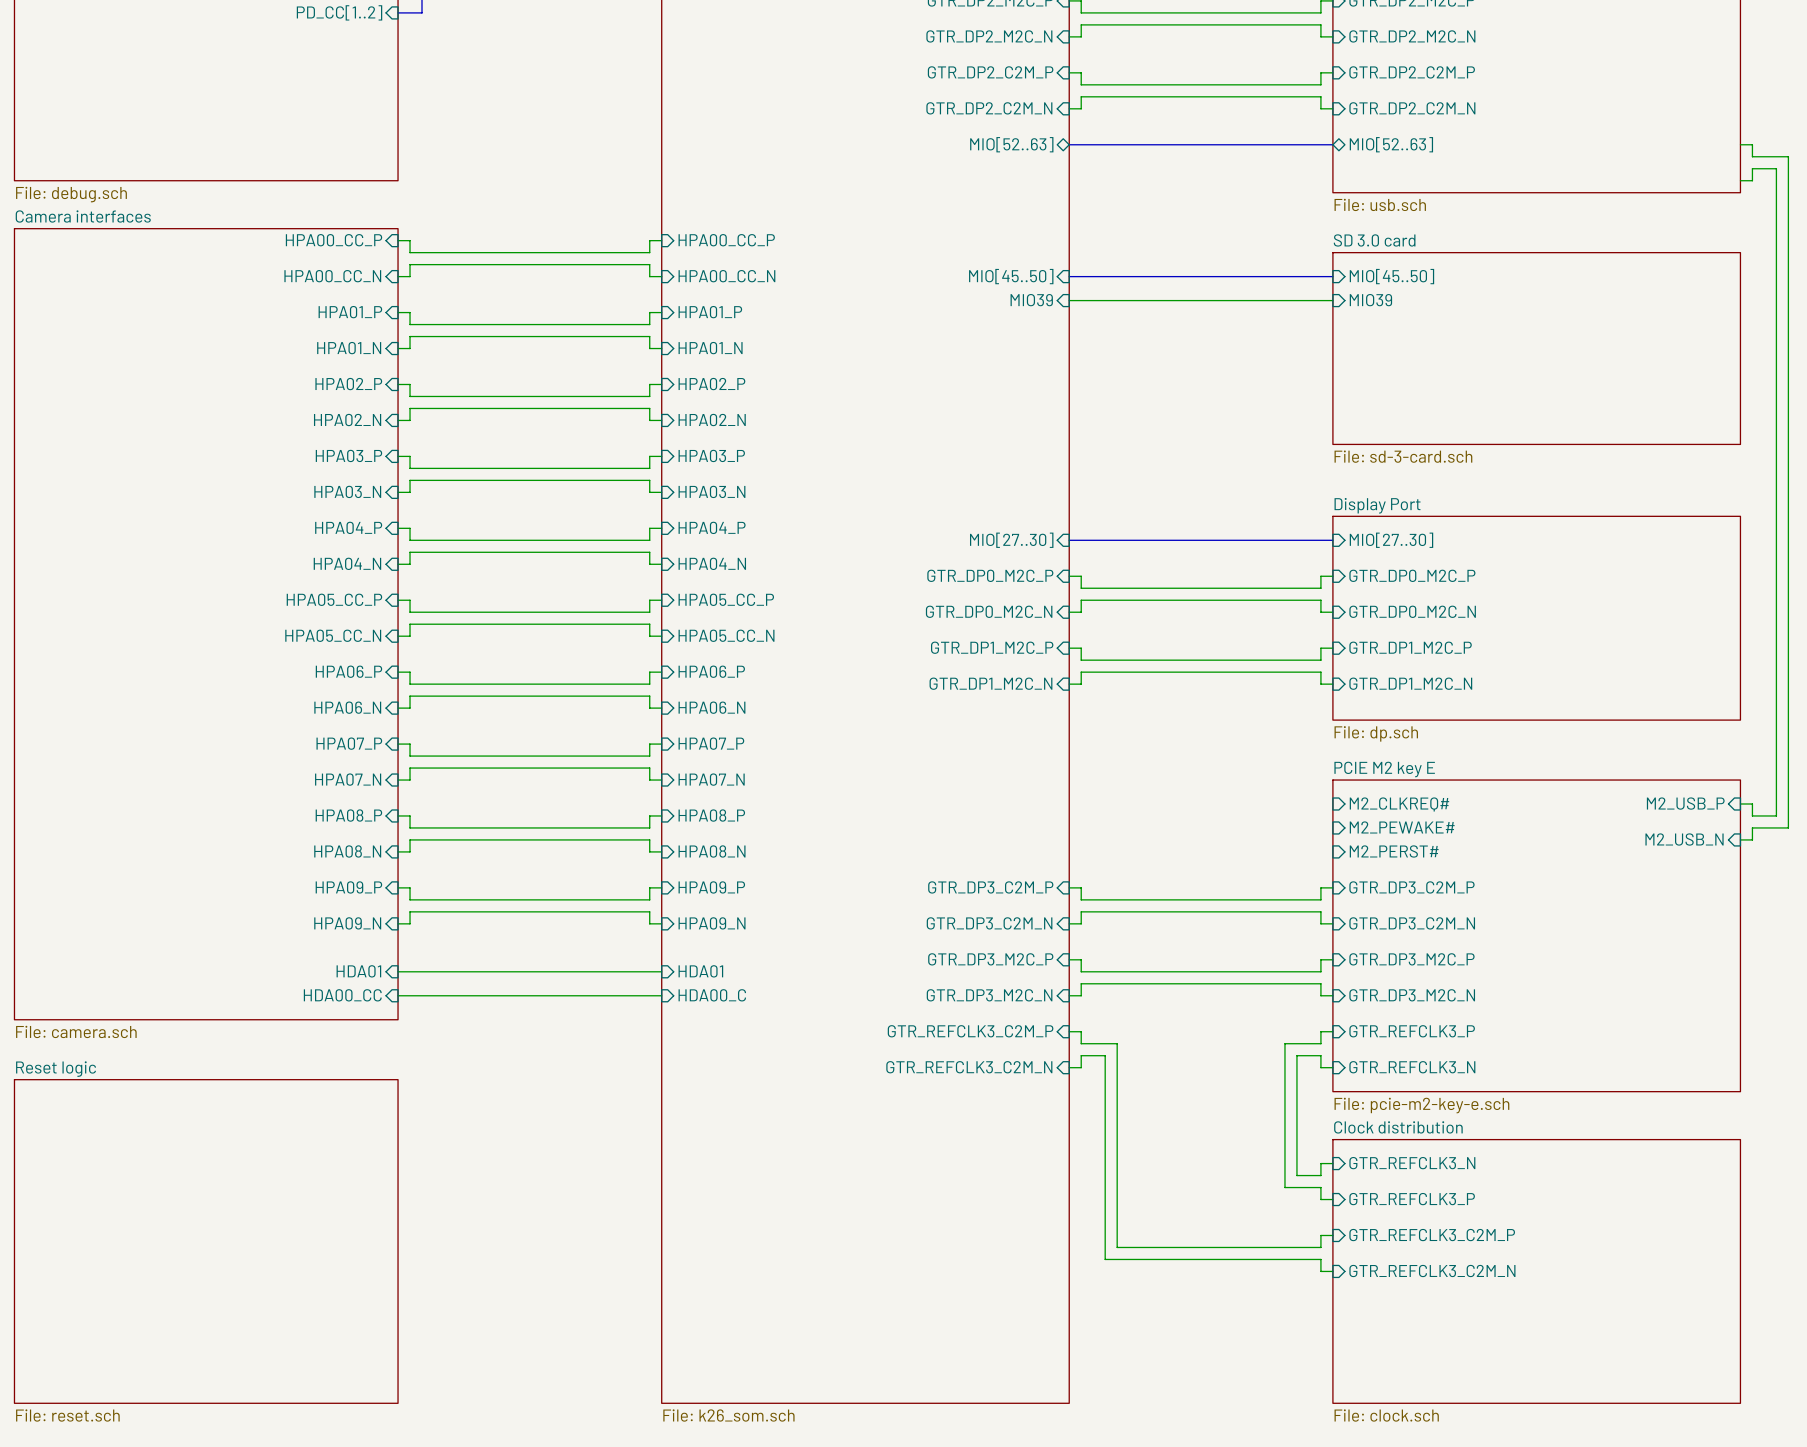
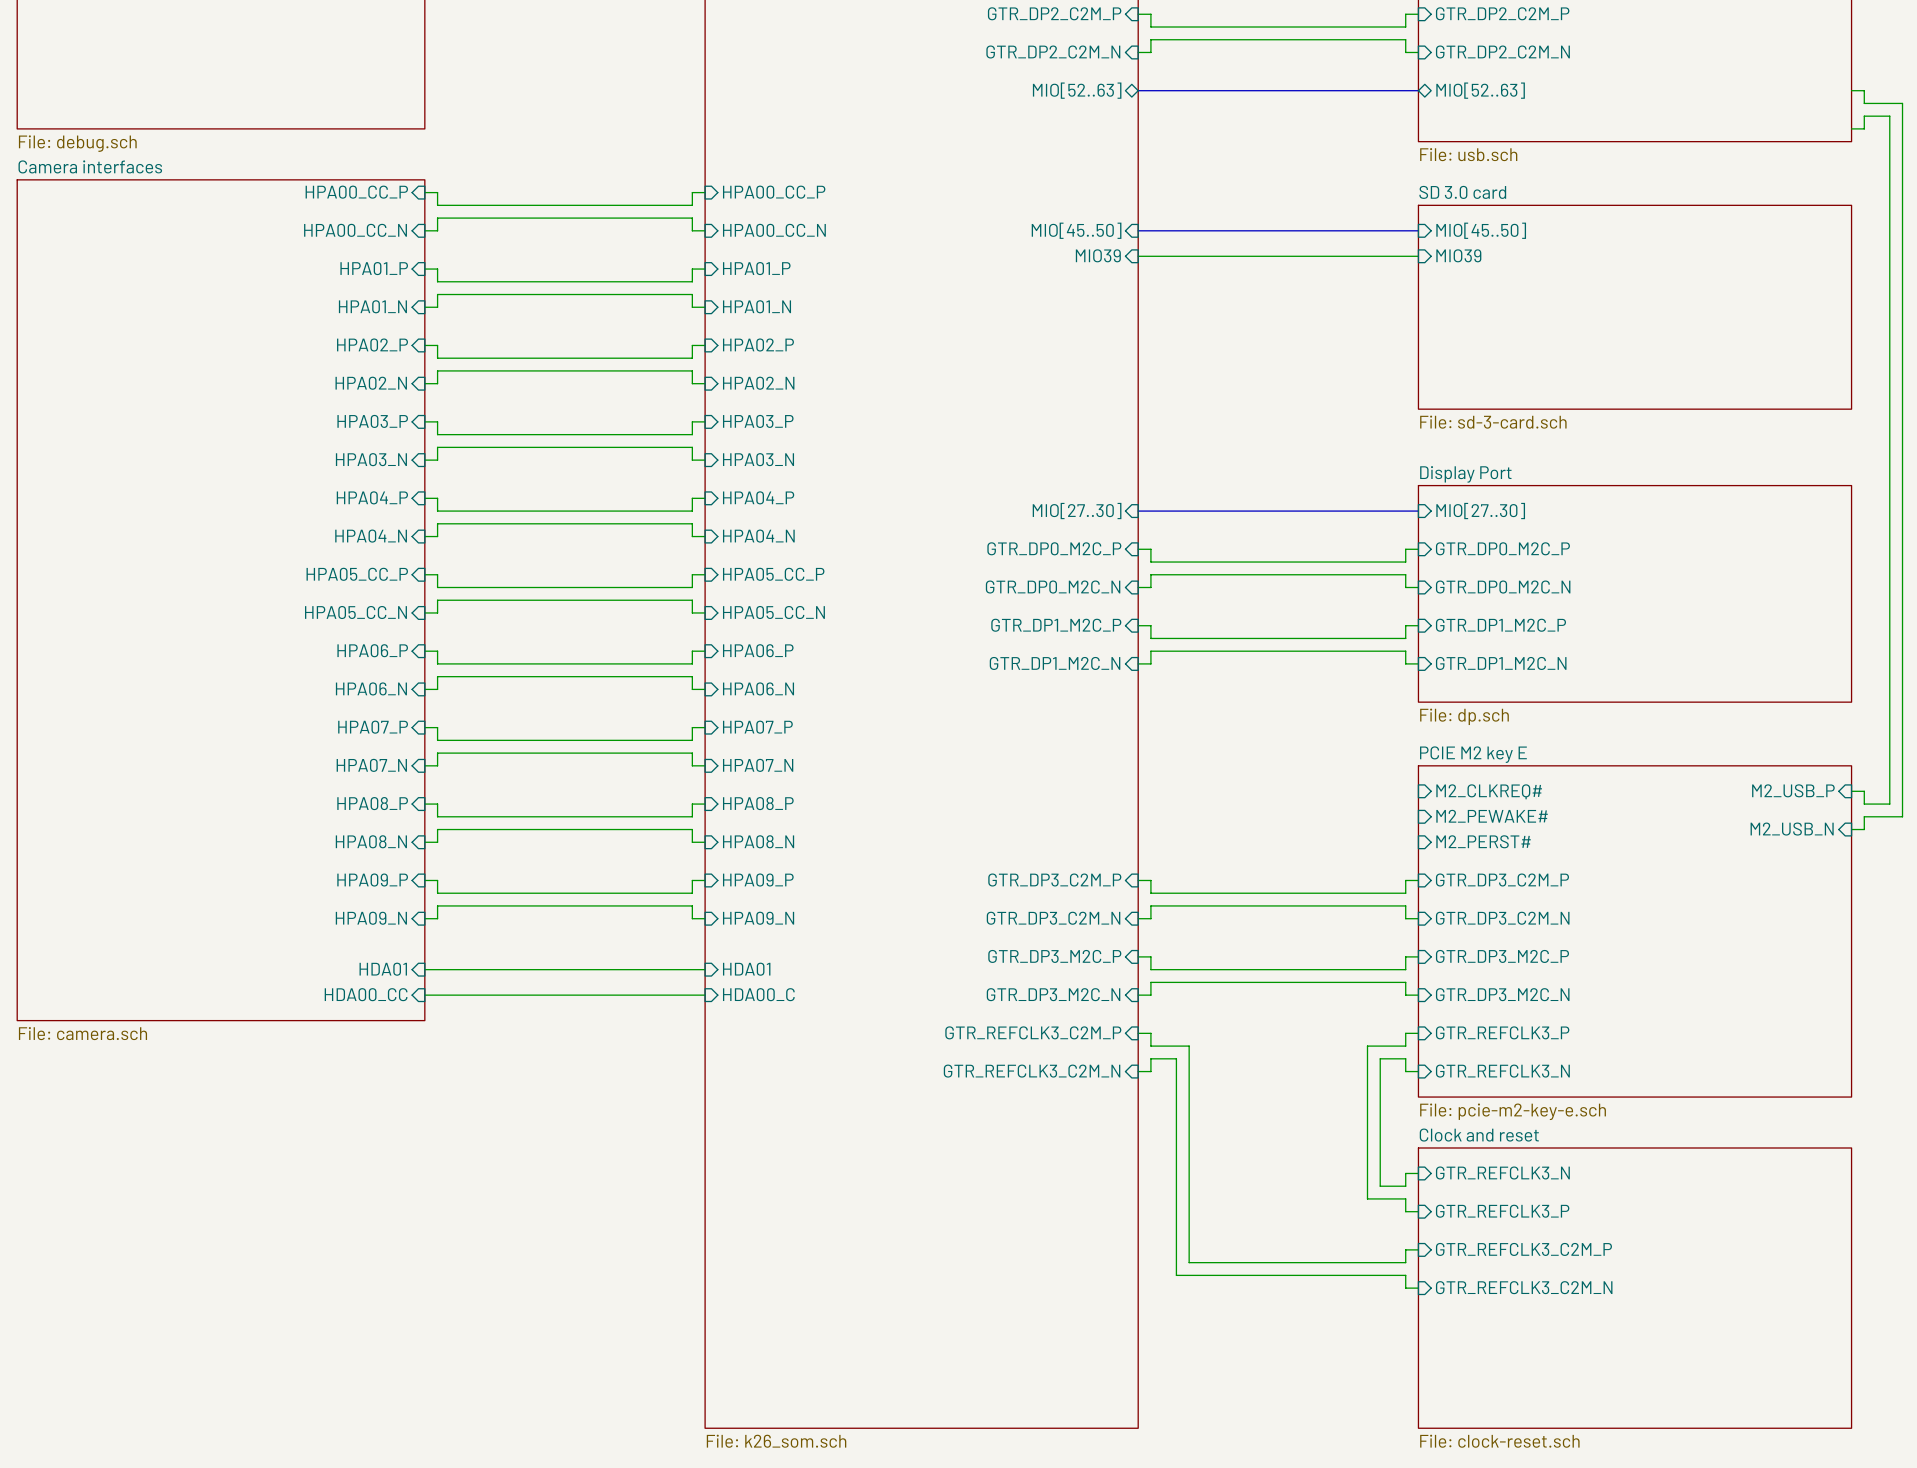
sheet Clock distribution name: Clock distribution (1398, 1127) -> Clock and reset (1479, 1135)
sheet Reset logic: File: reset.sch (206, 1241) -> none
sheet Clock distribution value: File: clock.sch (1386, 1415) -> File: clock-reset.sch (1499, 1441)

